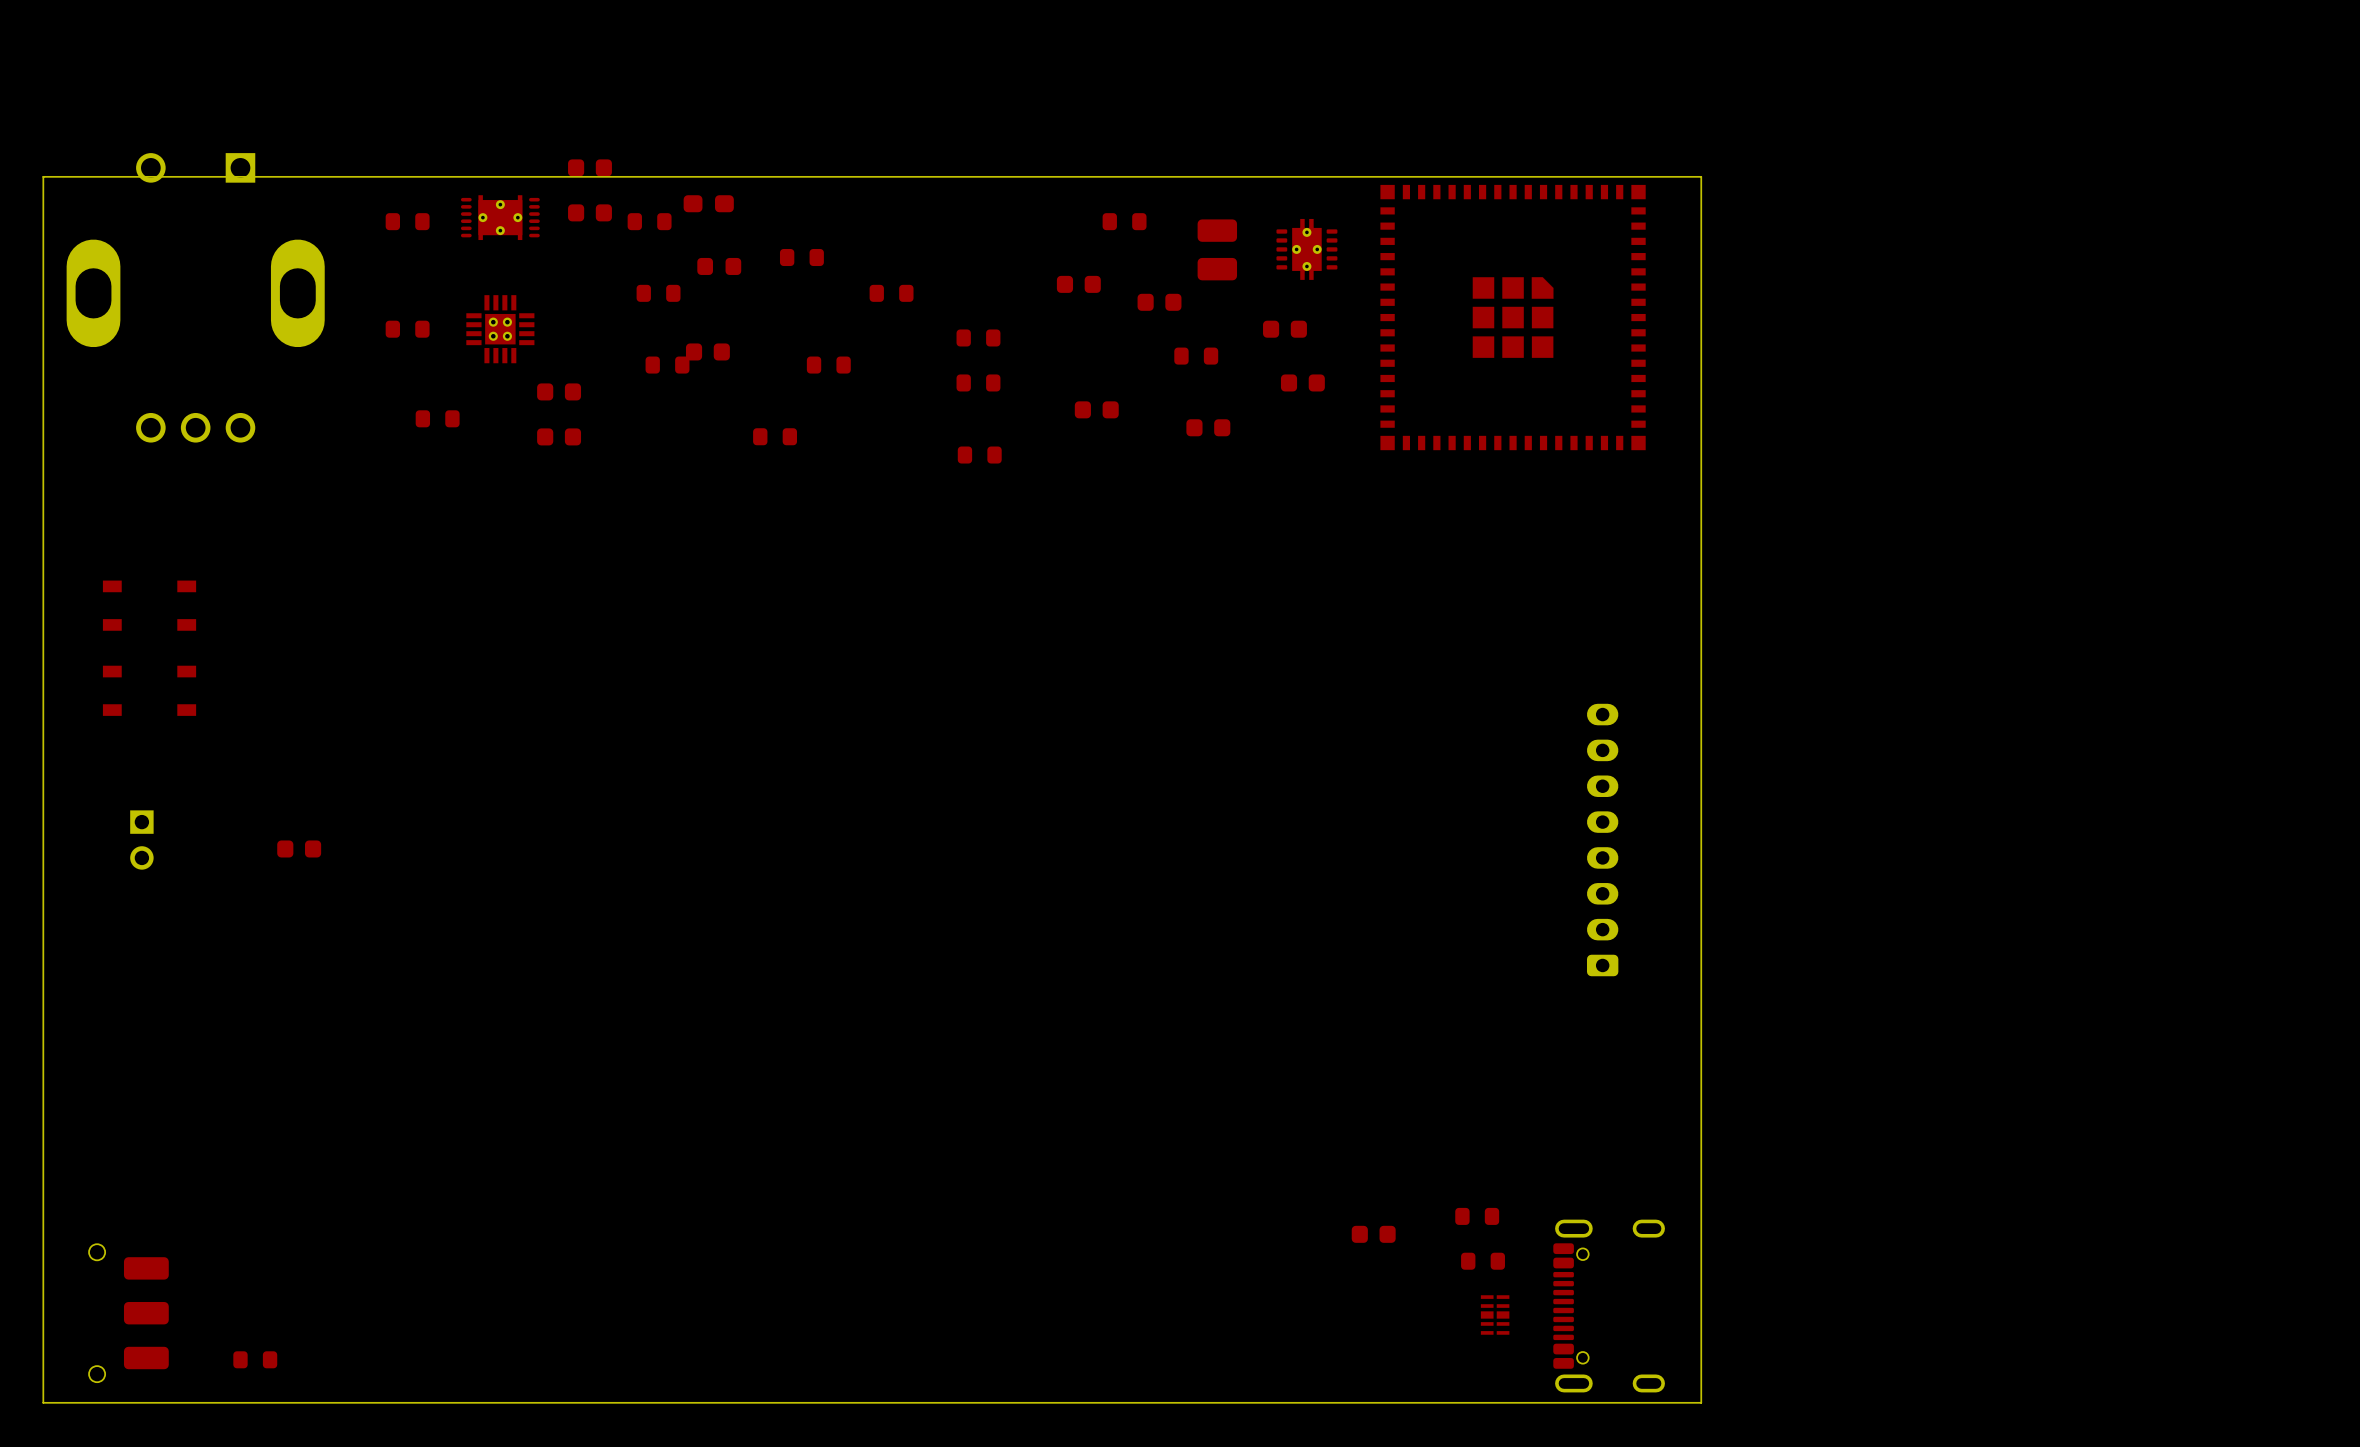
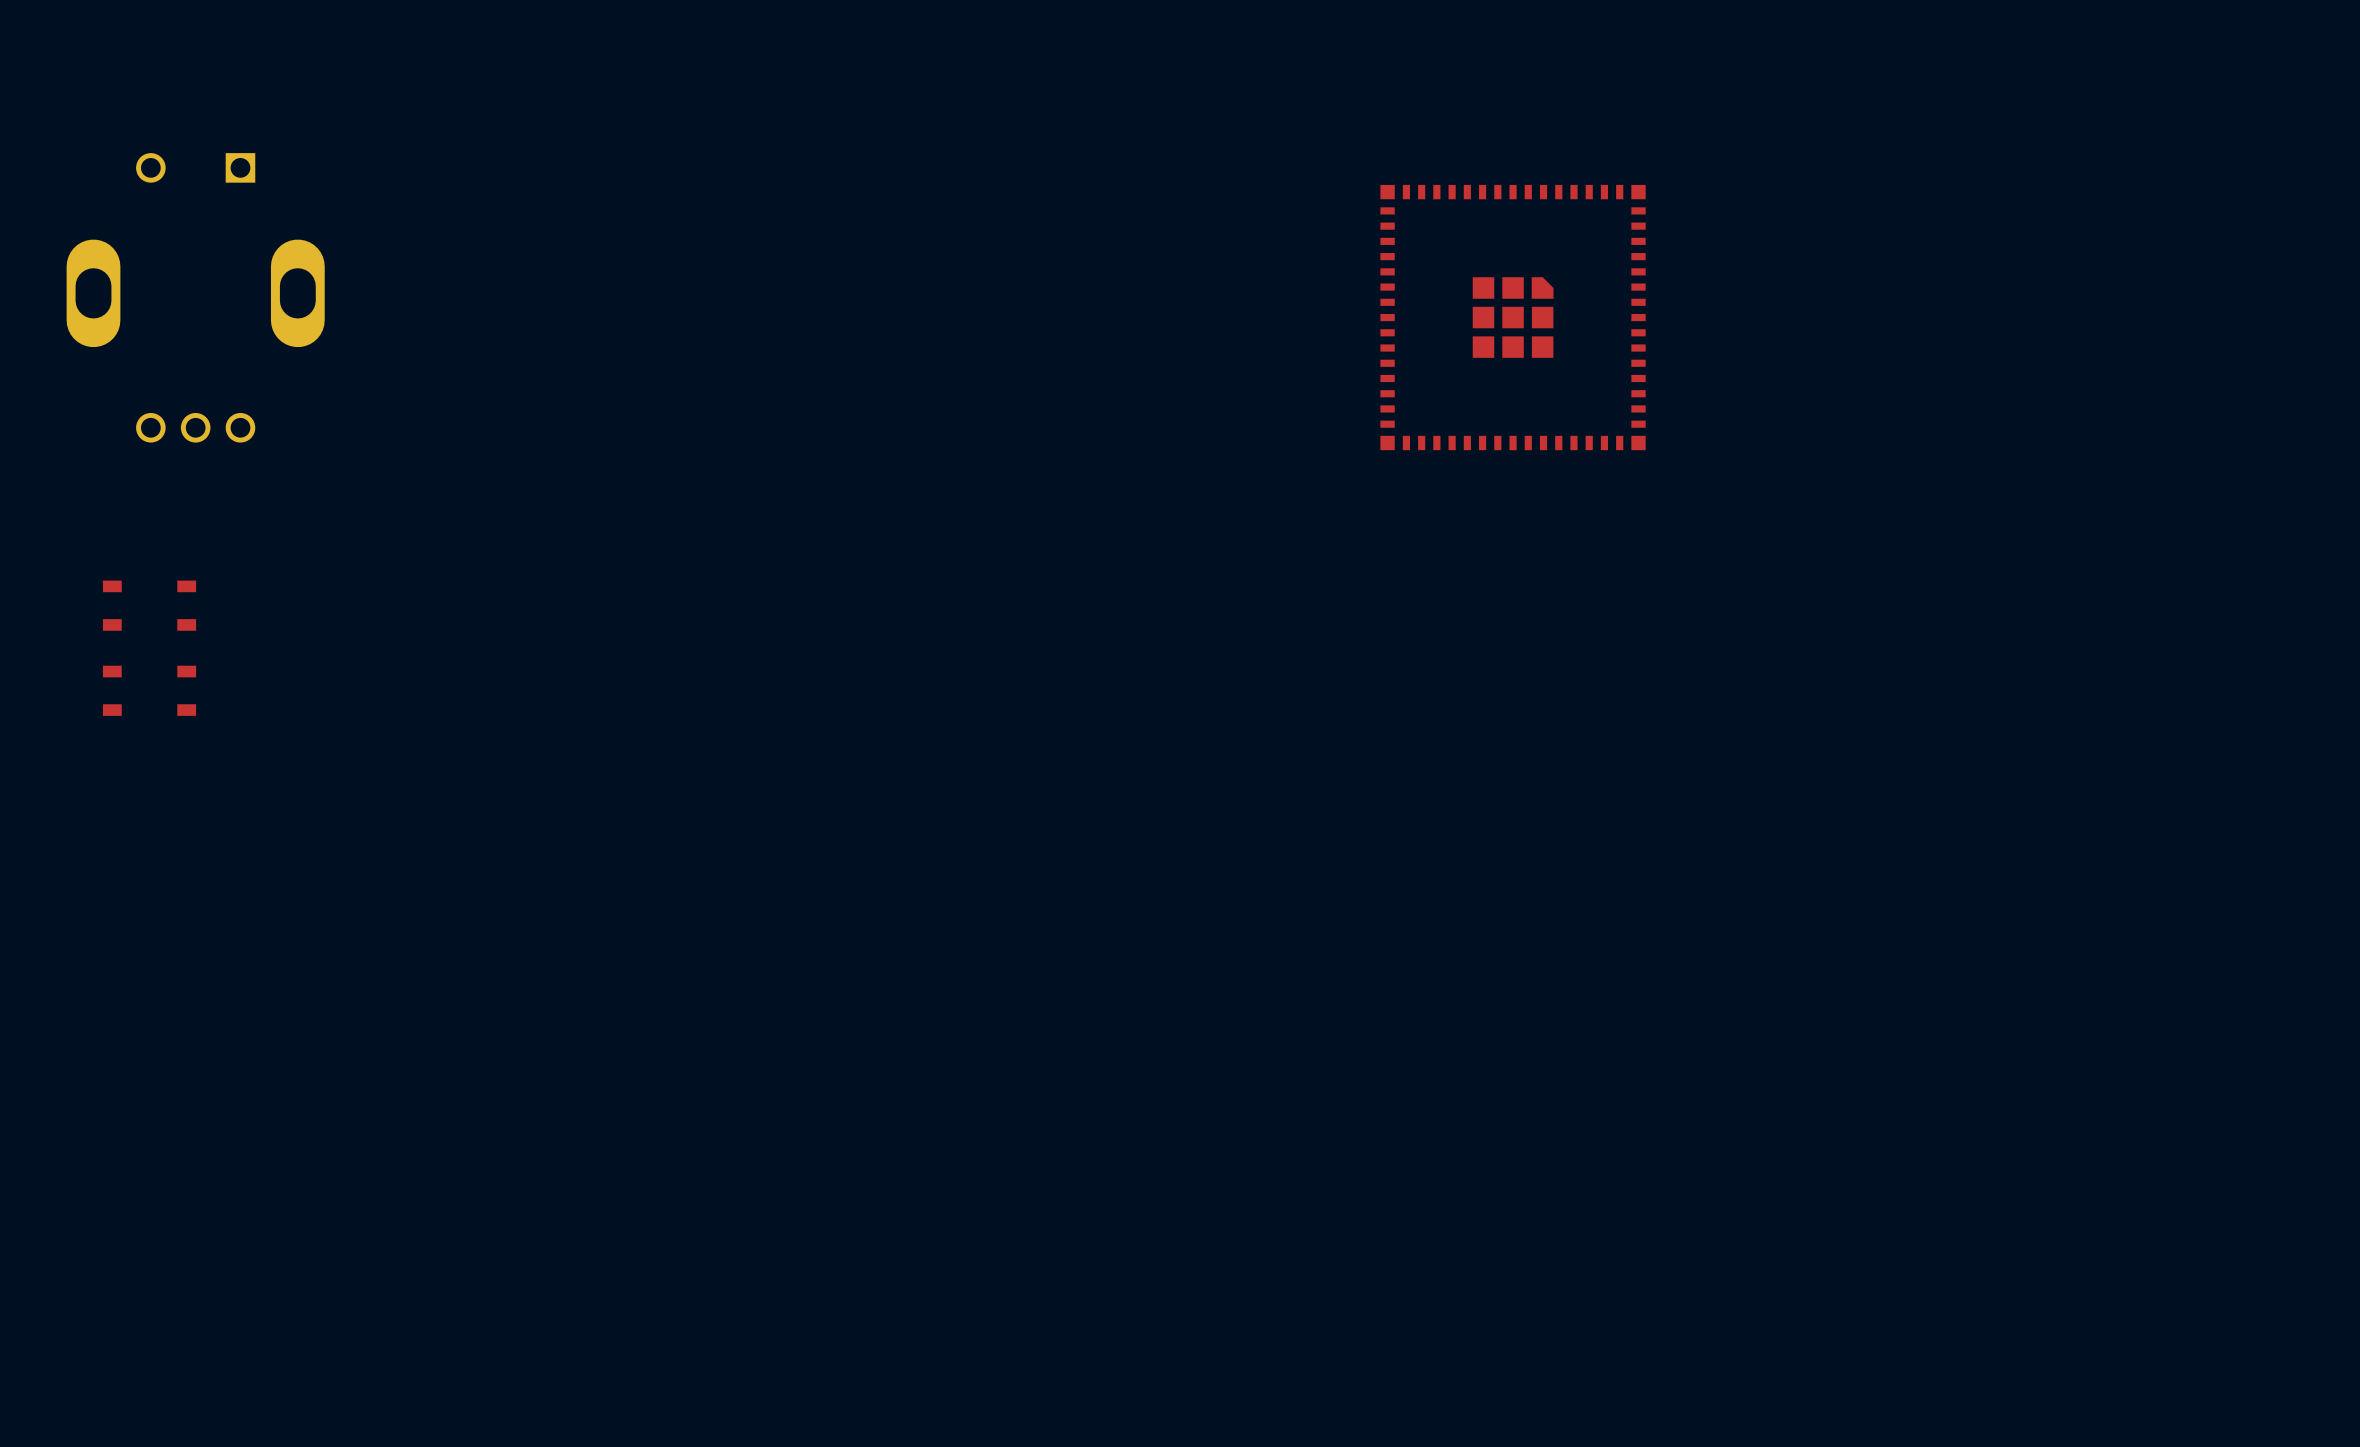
part: (589, 167) -> none
board edge: (1701, 176) (43, 176) (43, 1402) (1701, 1402) (1701, 176) -> none
part: (708, 203) -> none
part: (589, 212) -> none
part: (500, 217) -> none
part: (407, 221) -> none
part: (649, 221) -> none
part: (1124, 221) -> none
part: (1217, 249) -> none
part: (1306, 249) -> none
part: (801, 257) -> none
part: (719, 266) -> none
part: (1078, 284) -> none
part: (658, 293) -> none
part: (891, 293) -> none
part: (1159, 302) -> none
part: (407, 329) -> none
part: (500, 329) -> none
part: (1284, 329) -> none
part: (978, 337) -> none
part: (707, 351) -> none
part: (1196, 356) -> none
part: (667, 365) -> none
part: (828, 365) -> none
part: (978, 382) -> none
part: (1302, 382) -> none
part: (559, 391) -> none
part: (1096, 409) -> none
part: (437, 418) -> none
part: (1208, 427) -> none
part: (559, 436) -> none
part: (775, 436) -> none
part: (979, 455) -> none
part: (141, 840) -> none
part: (1602, 840) -> none
part: (299, 848) -> none
part: (1477, 1216) -> none
part: (1373, 1234) -> none
part: (1483, 1261) -> none
part: (1609, 1306) -> none
part: (128, 1313) -> none
part: (1495, 1314) -> none
part: (255, 1359) -> none

